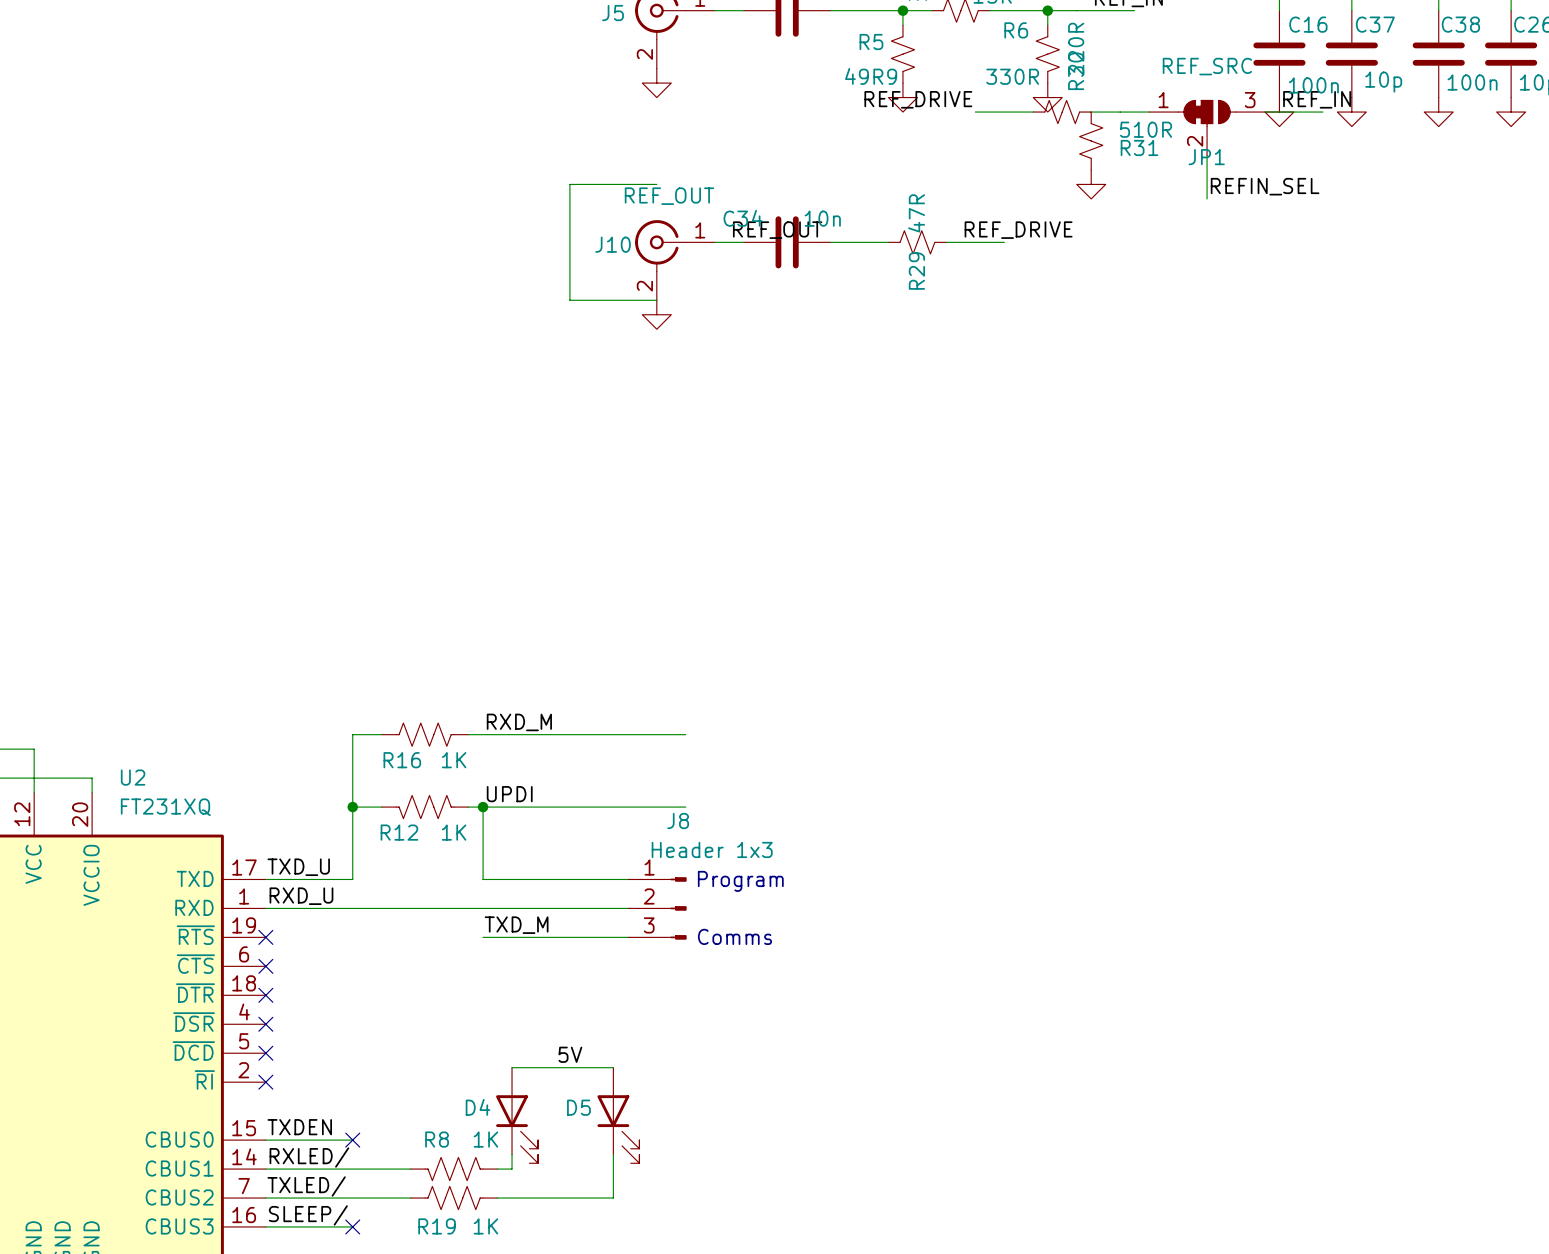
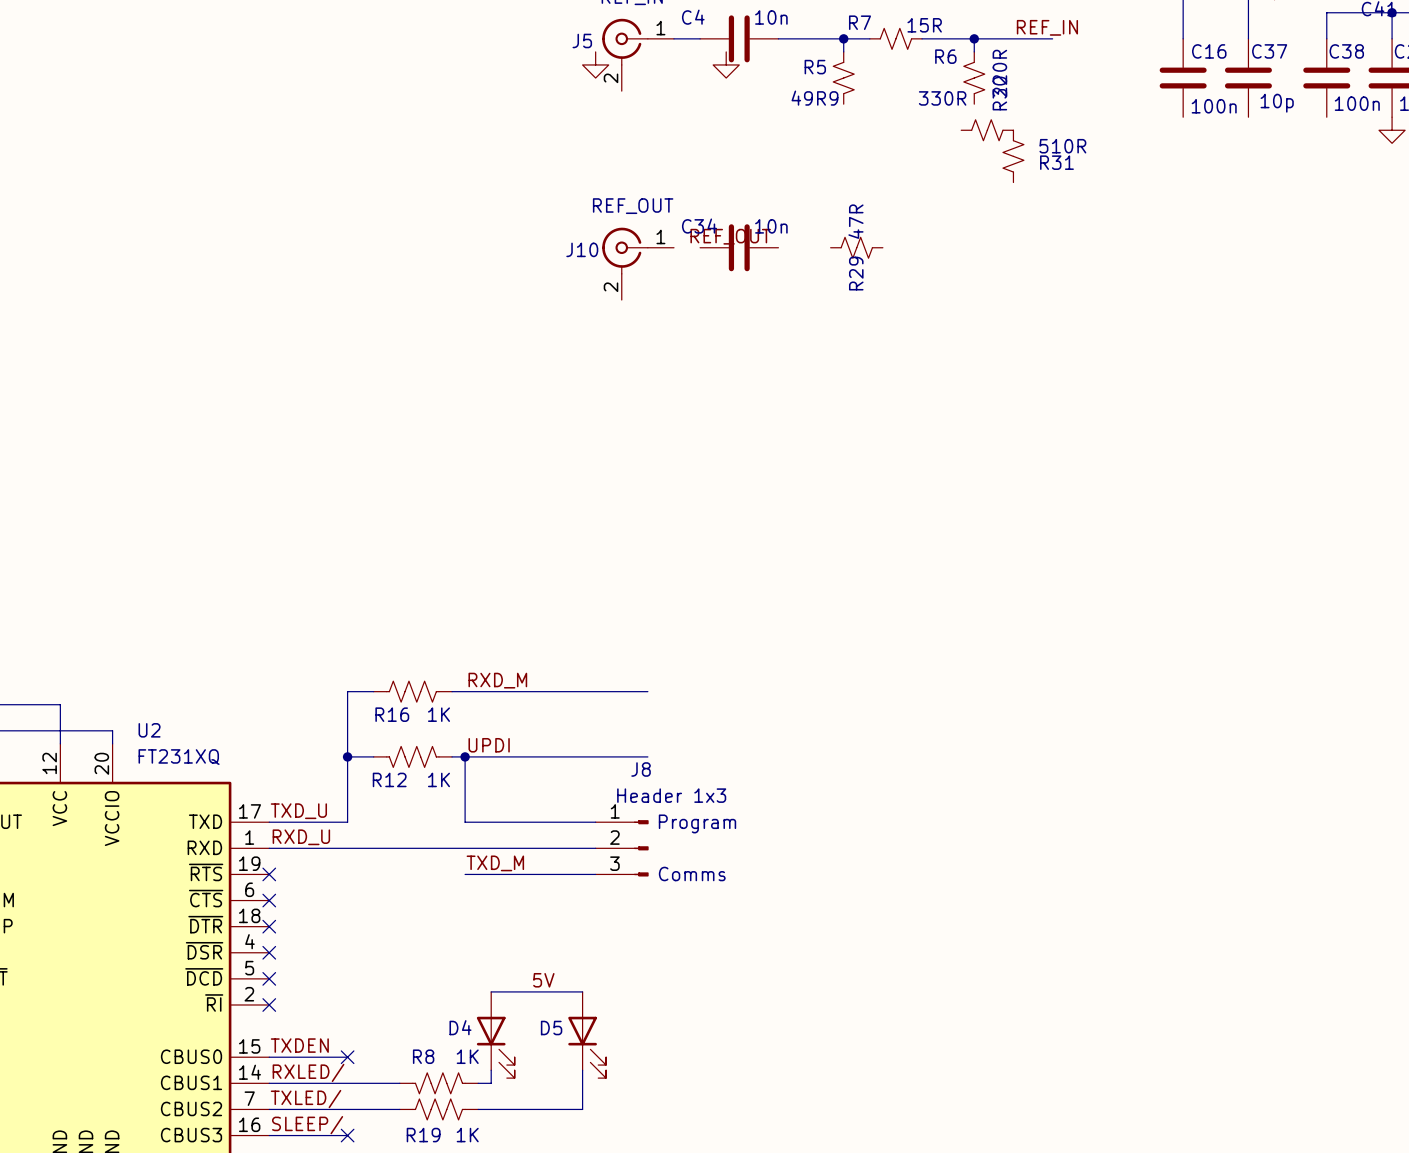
power symbol: none -> (726, 64)
power symbol position: (656, 83) -> (595, 64)
power symbol: (902, 97) -> none
power symbol: (1047, 97) -> none
label: REF_DRIVE (918, 99) -> none
label: REF_IN (1317, 99) -> none
wire: (975, 112) (1033, 112) -> none
wire: (1091, 112) (1149, 112) -> none
wire: (1264, 112) (1322, 112) -> none
power symbol: (1279, 112) -> none
power symbol: (1351, 112) -> none
power symbol: (1438, 112) -> none
JP1: REF_SRC (1207, 127) -> none
wire: (1207, 155) (1207, 198) -> none
wire: (656, 184) (569, 184) (569, 300) (656, 300) -> none
power symbol: (1091, 184) -> none
label: REFIN_SEL (1265, 186) -> none
label: REF_DRIVE (1018, 230) -> none
wire: (714, 242) (743, 242) -> none
wire: (830, 242) (888, 242) -> none
wire: (946, 242) (1004, 242) -> none
power symbol: (656, 314) -> none

